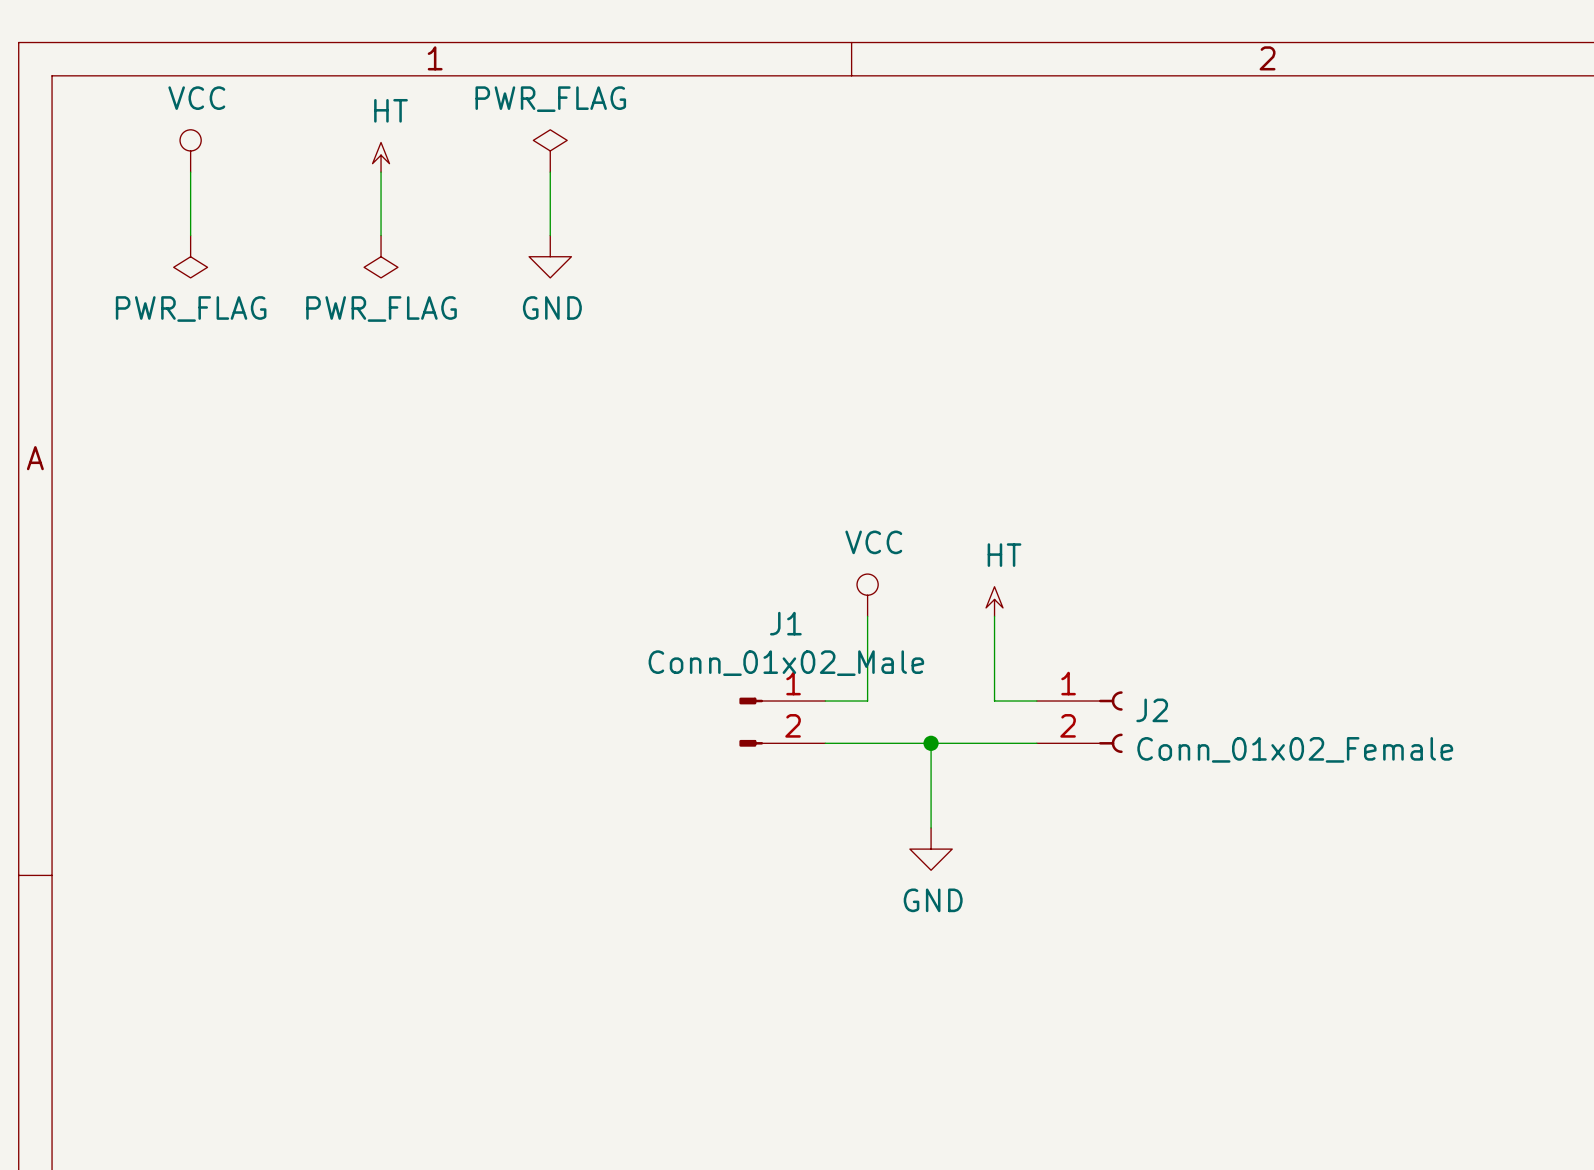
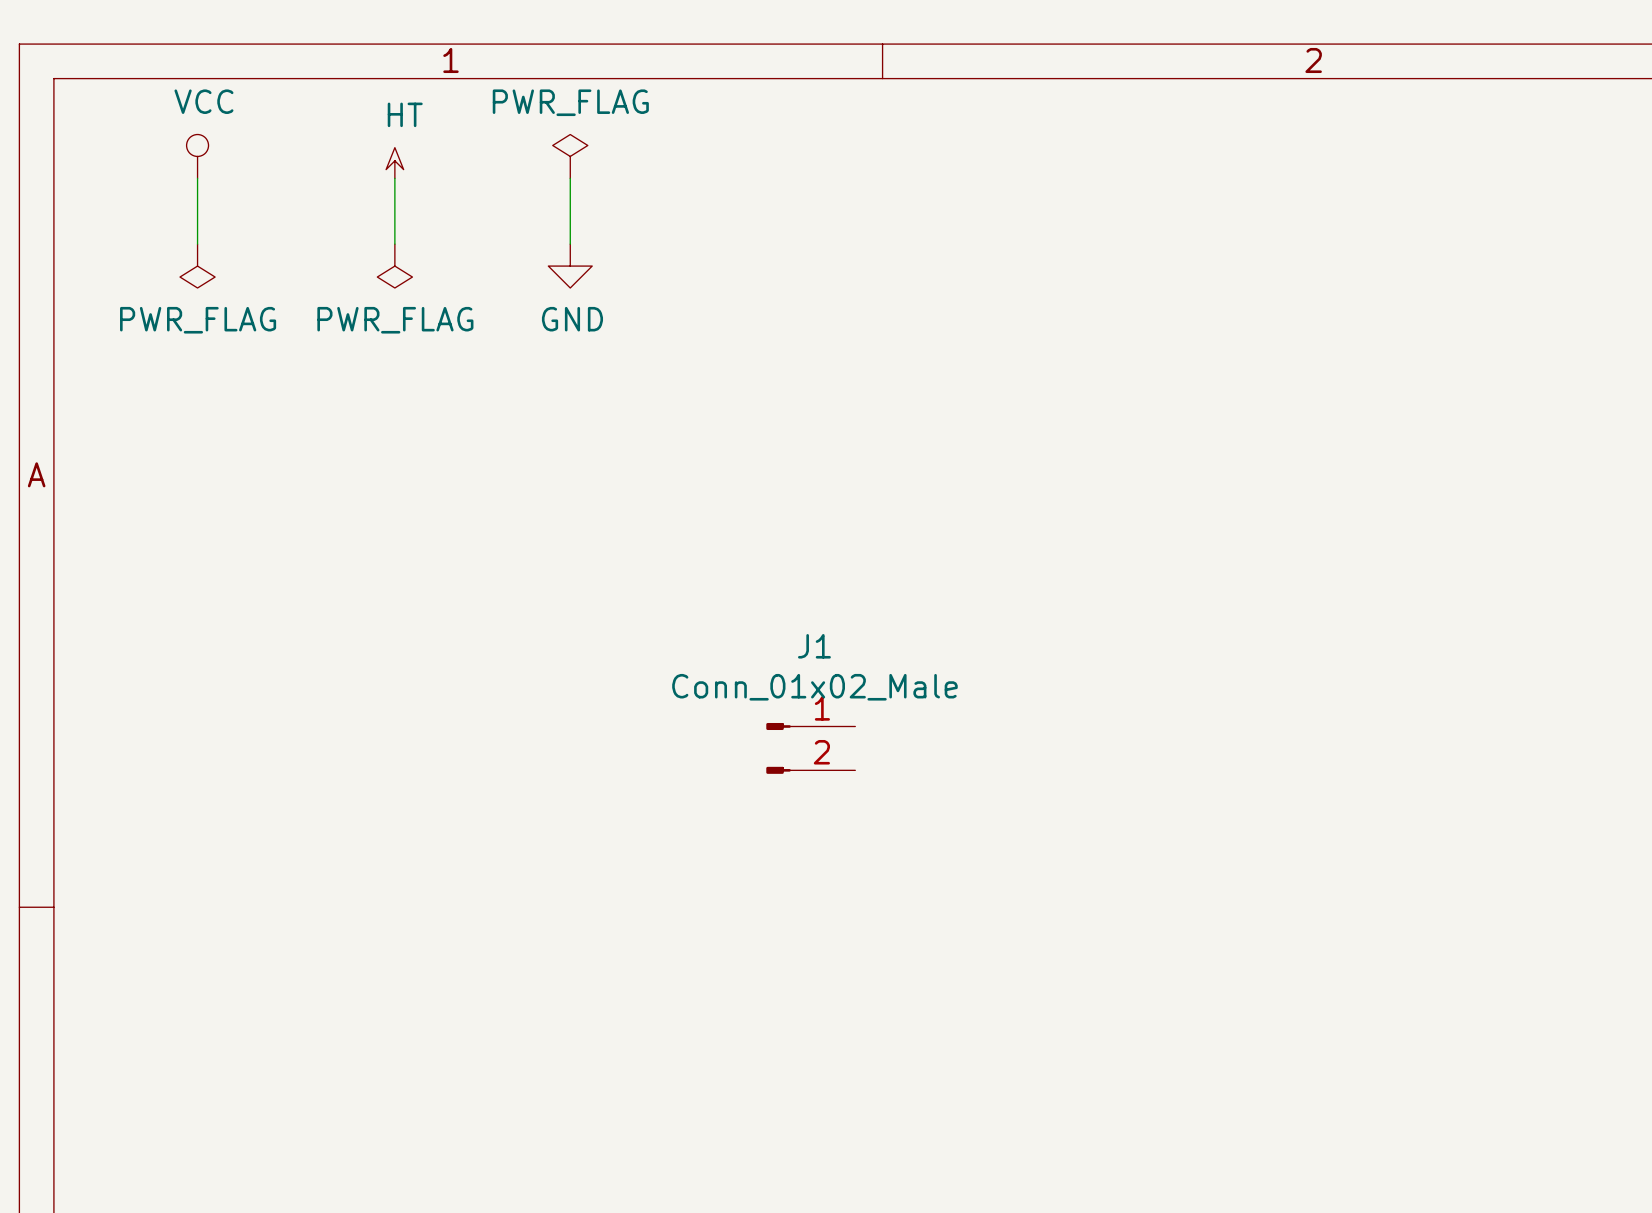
power symbol: VCC (867, 595) -> none
power symbol: HT (994, 601) -> none
wire: (867, 616) (867, 701) (825, 701) -> none
wire: (994, 616) (994, 701) (1036, 701) -> none
J2: Conn_01x02_Female (1079, 722) -> none
wire: (825, 743) (1036, 743) -> none
wire: (931, 743) (931, 827) -> none
junction: (931, 743) -> none
power symbol: GND (931, 849) -> none

